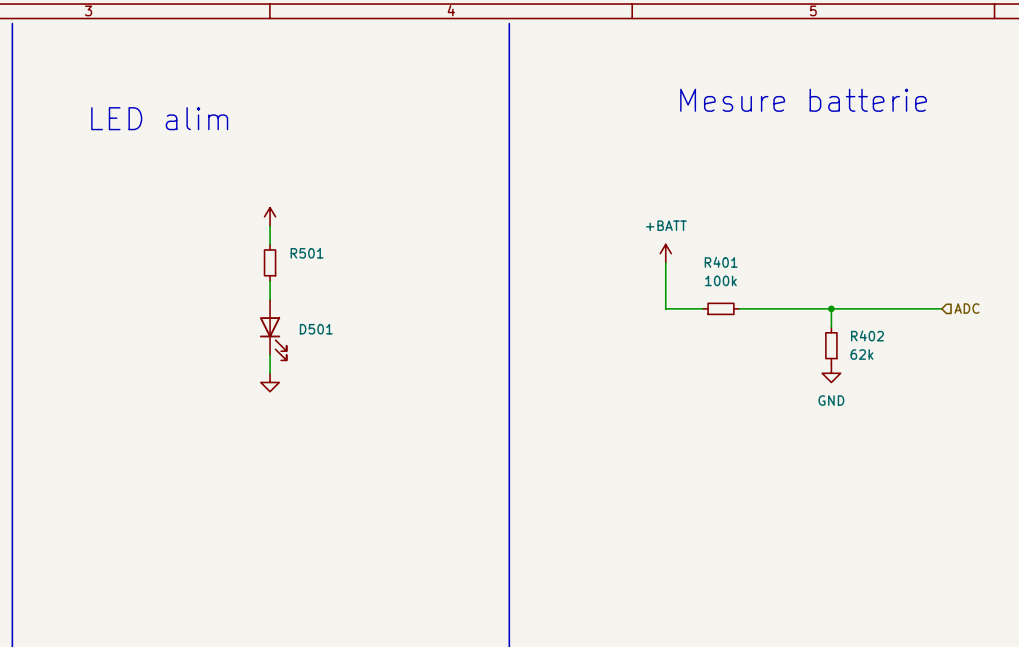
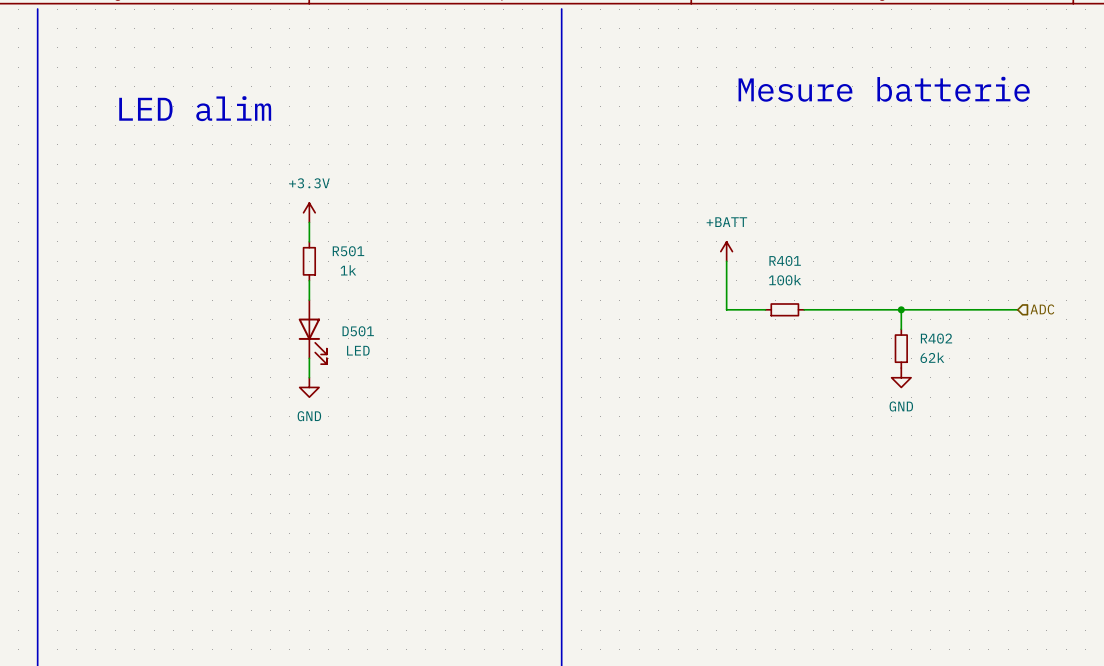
power symbol text: none -> +3.3V (309, 183)
R501 value: none -> 1k (348, 270)
D501 value: none -> LED (358, 350)
power symbol text: none -> GND (309, 416)

